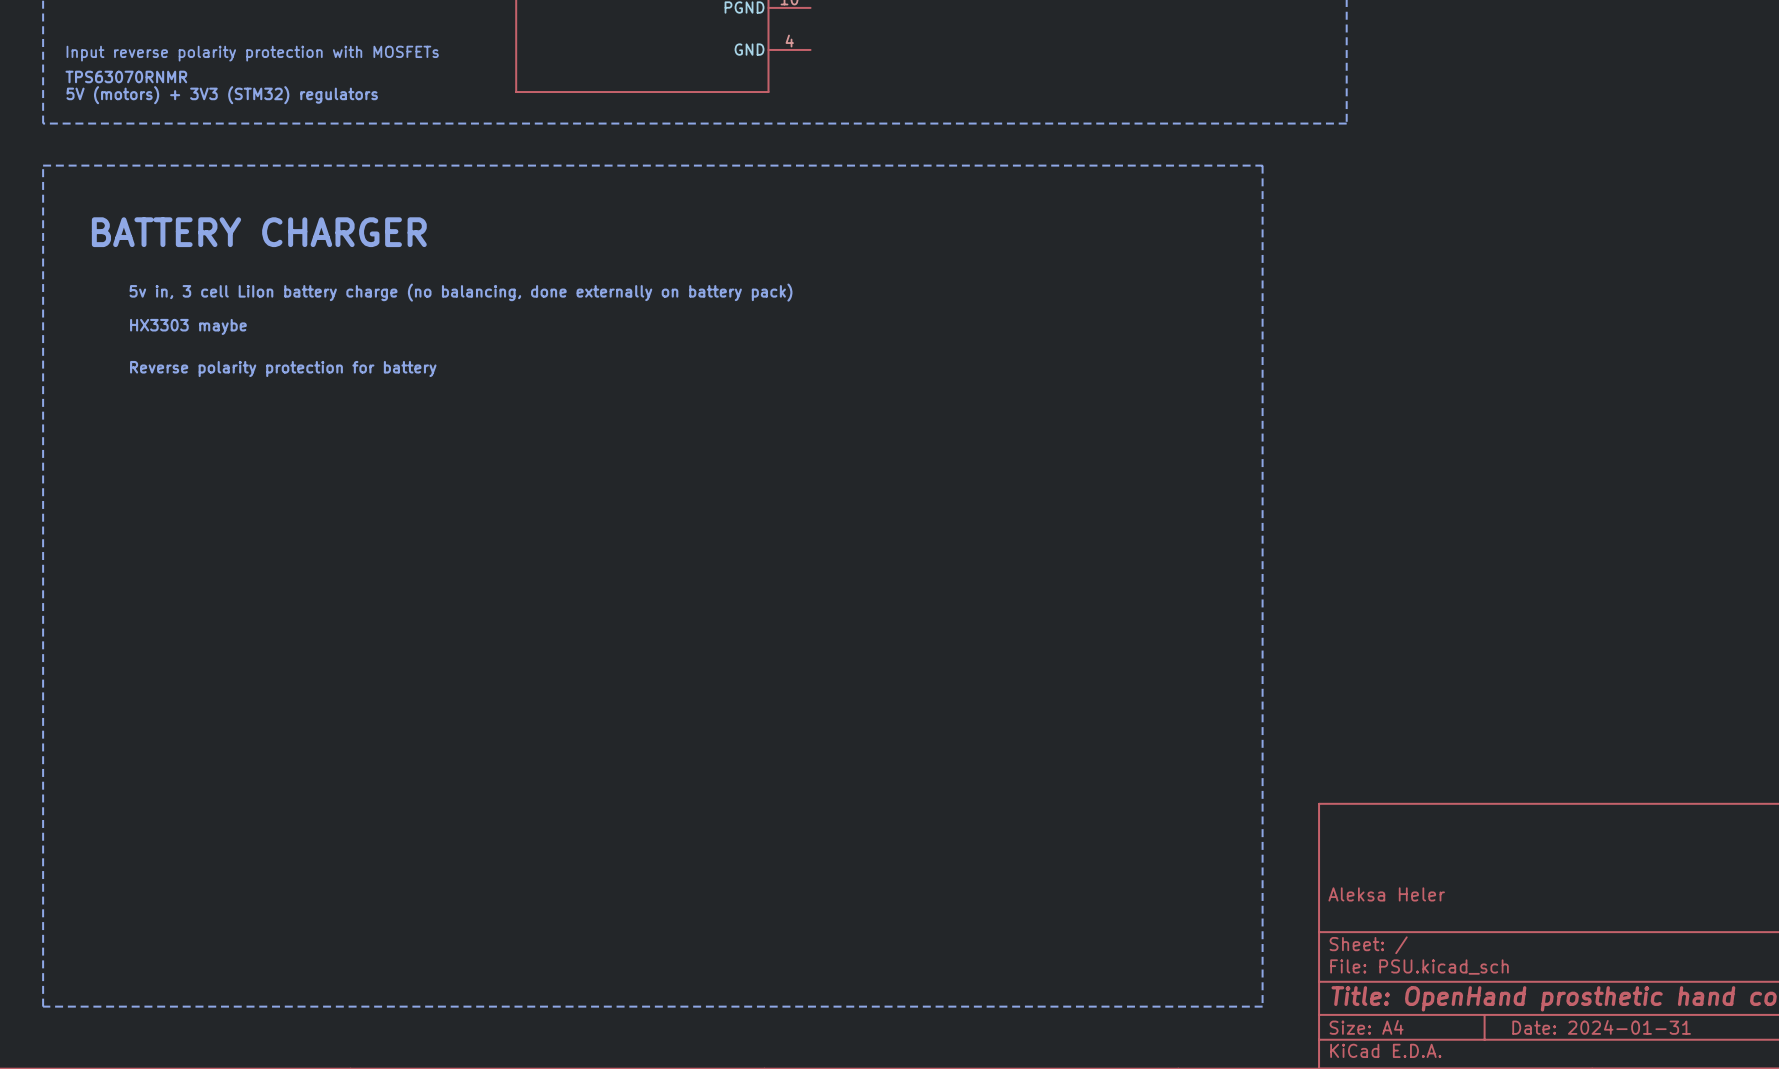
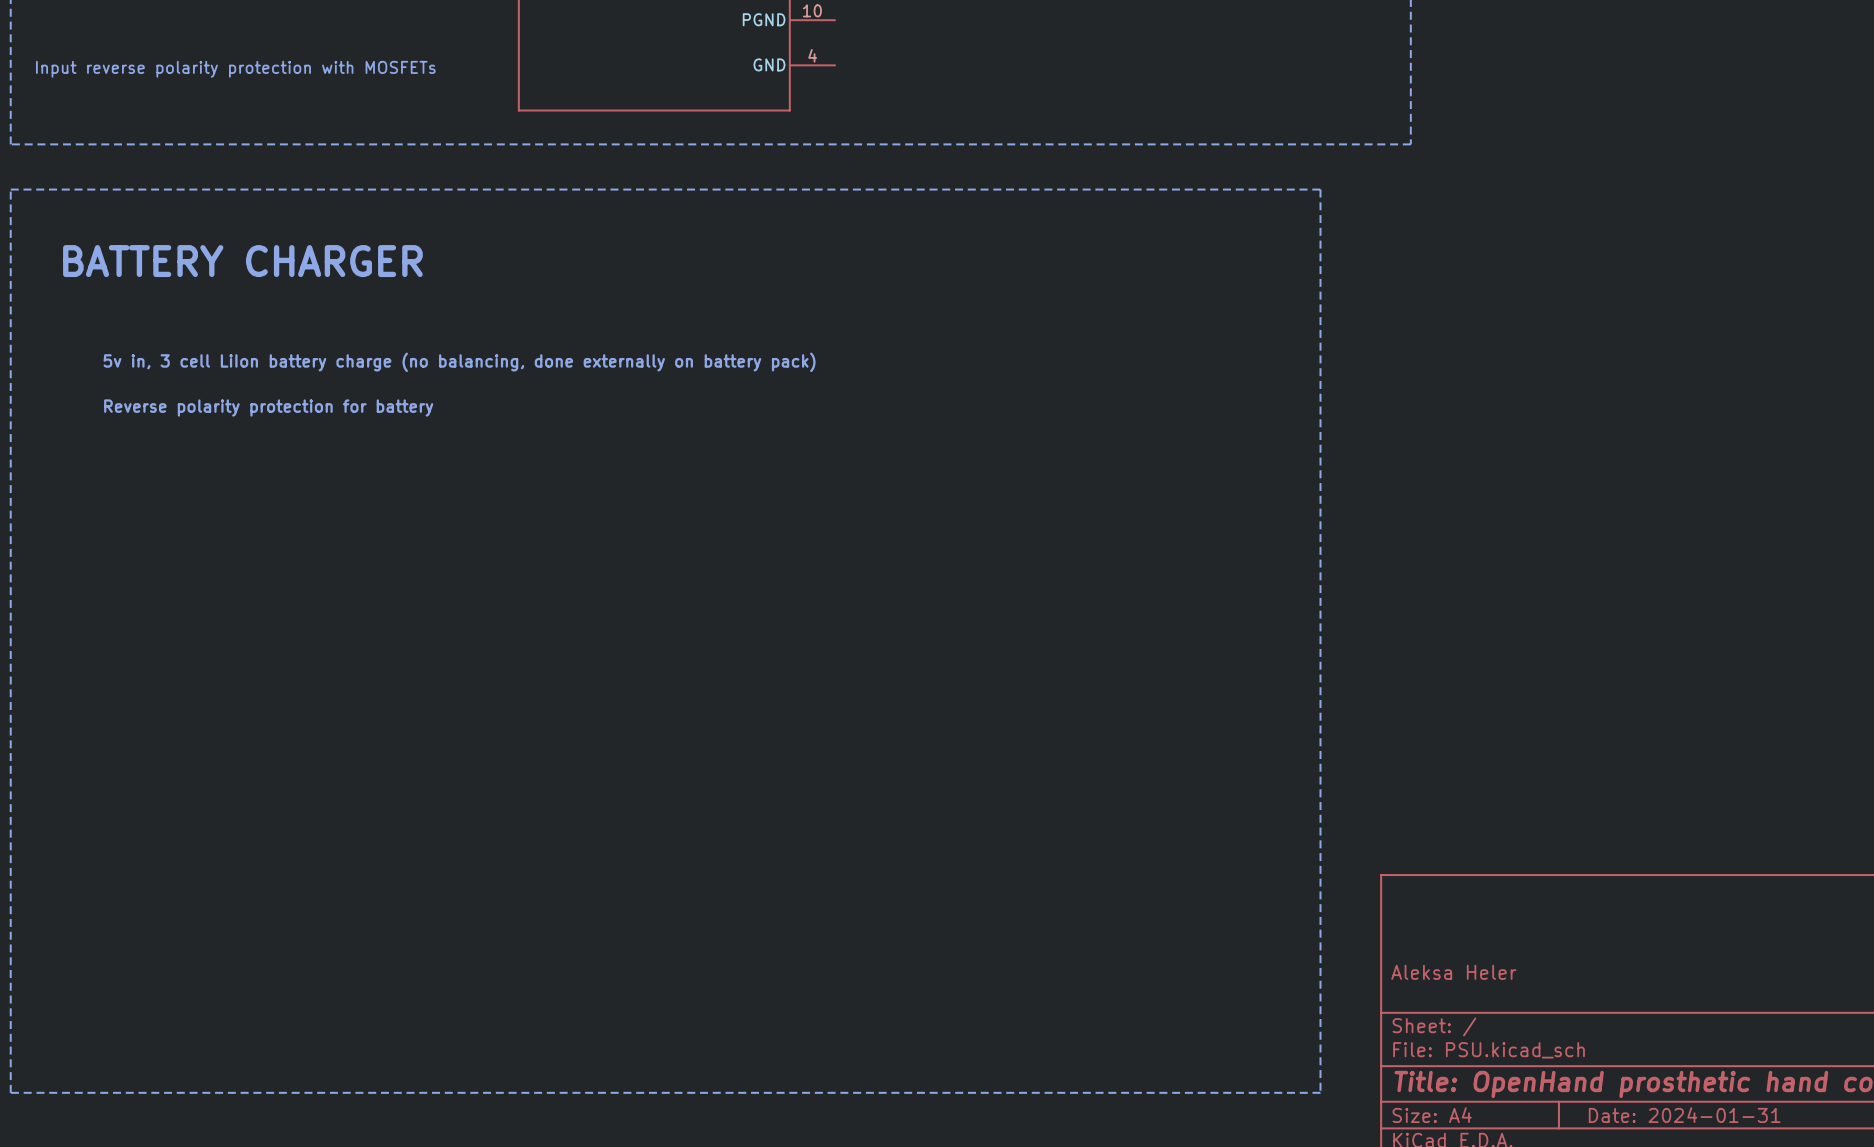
text: TPS63070RNMR (126, 76) -> none
text: 5V (motors) + 3V3 (STM32) regulators (222, 95) -> none
text: 5v in, 3 cell LiIon battery charge (no balancing, done externally on battery pack) (460, 292) -> none
text: HX3303 maybe (188, 326) -> 5v in, 3 cell LiIon battery charge (no balancing, done externally on battery pack) (459, 362)

